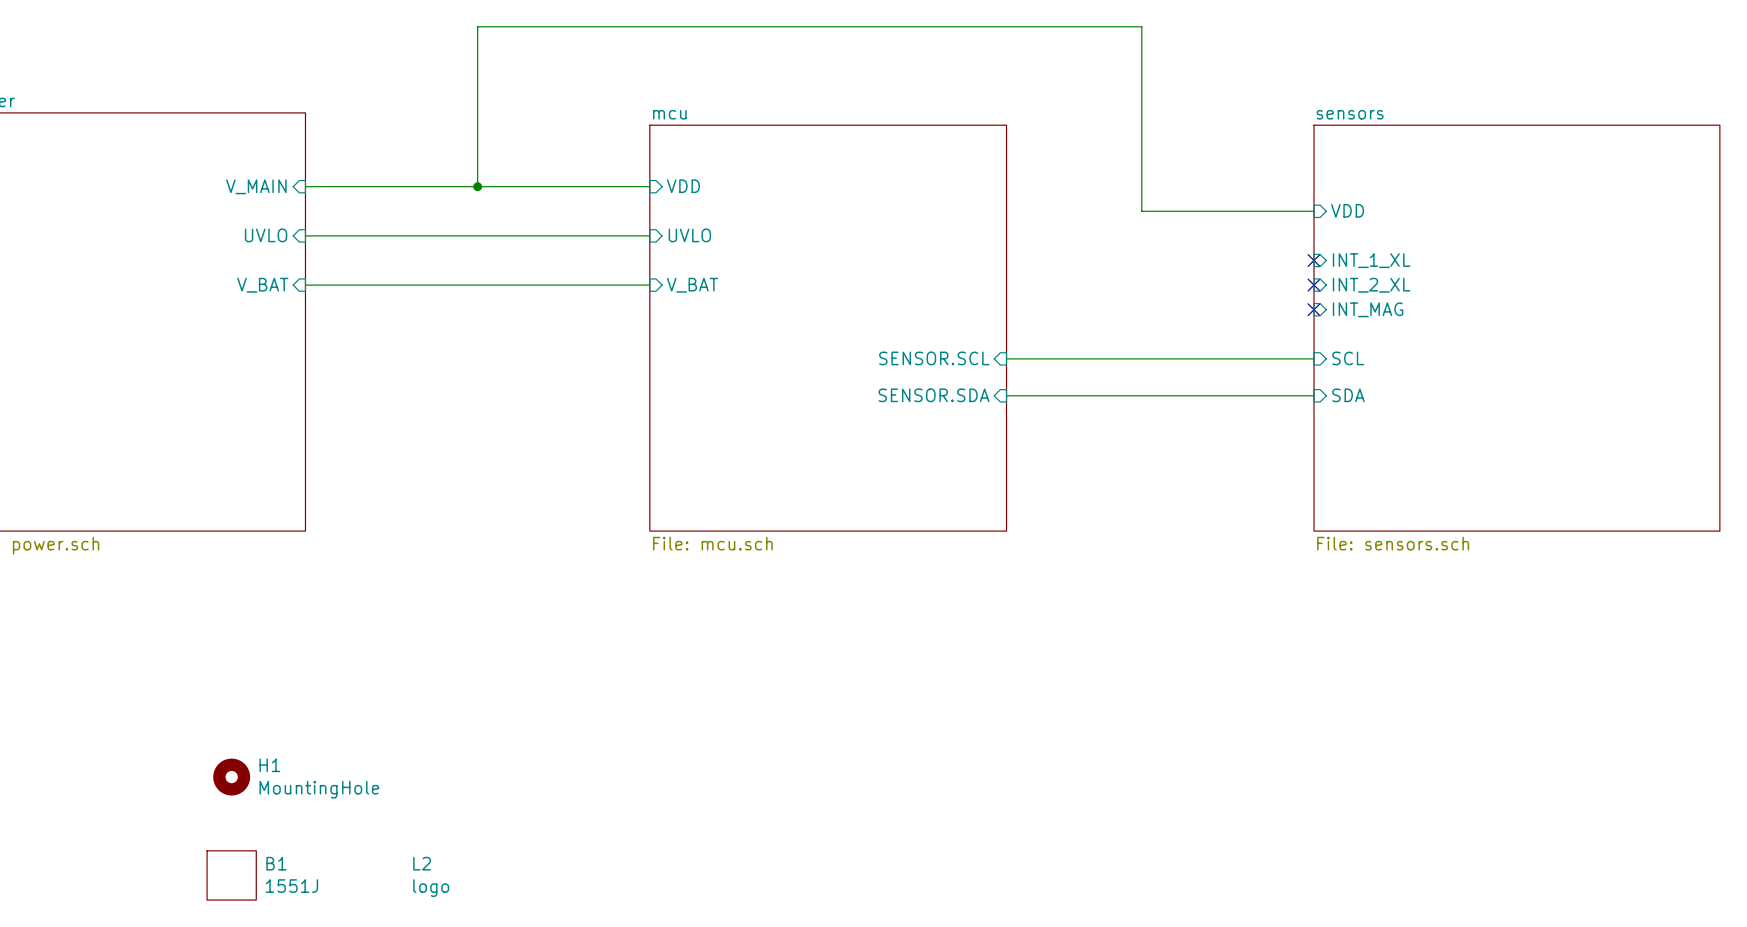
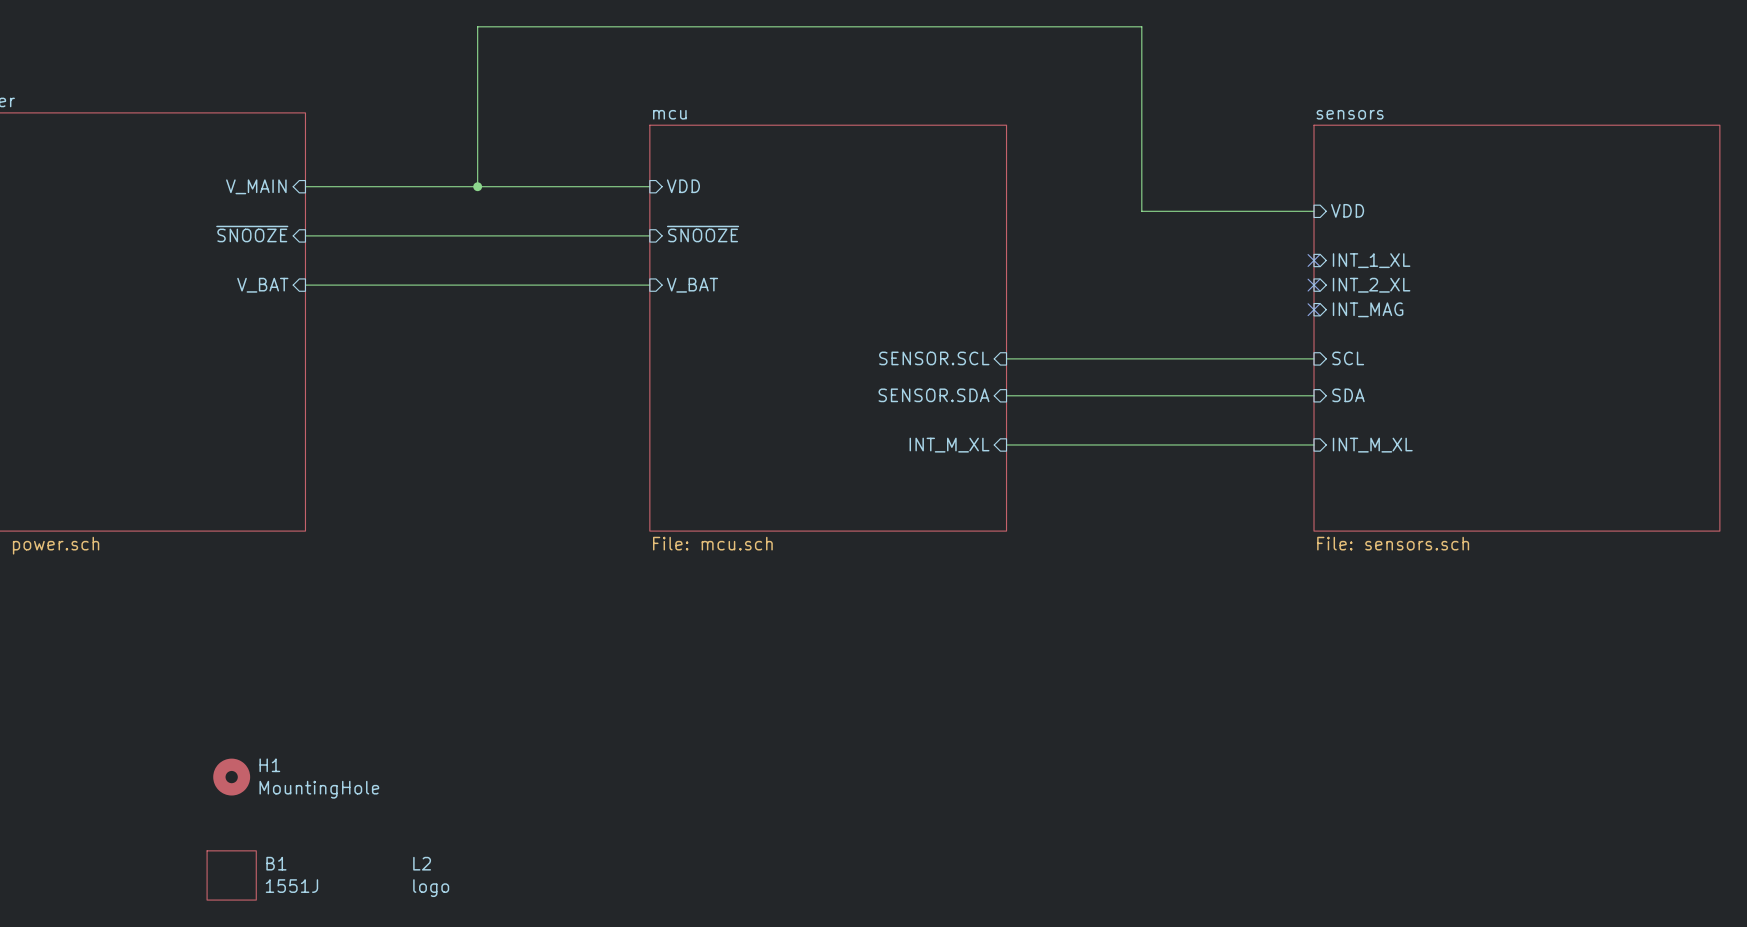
sheet pin: UVLO (266, 235) -> ~{SNOOZE} (252, 234)
sheet pin: UVLO (689, 235) -> ~{SNOOZE} (703, 234)
wire: none -> (1006, 444) (1314, 444)
sheet pin: none -> INT_M_XL (949, 445)
sheet pin: none -> INT_M_XL (1372, 445)

